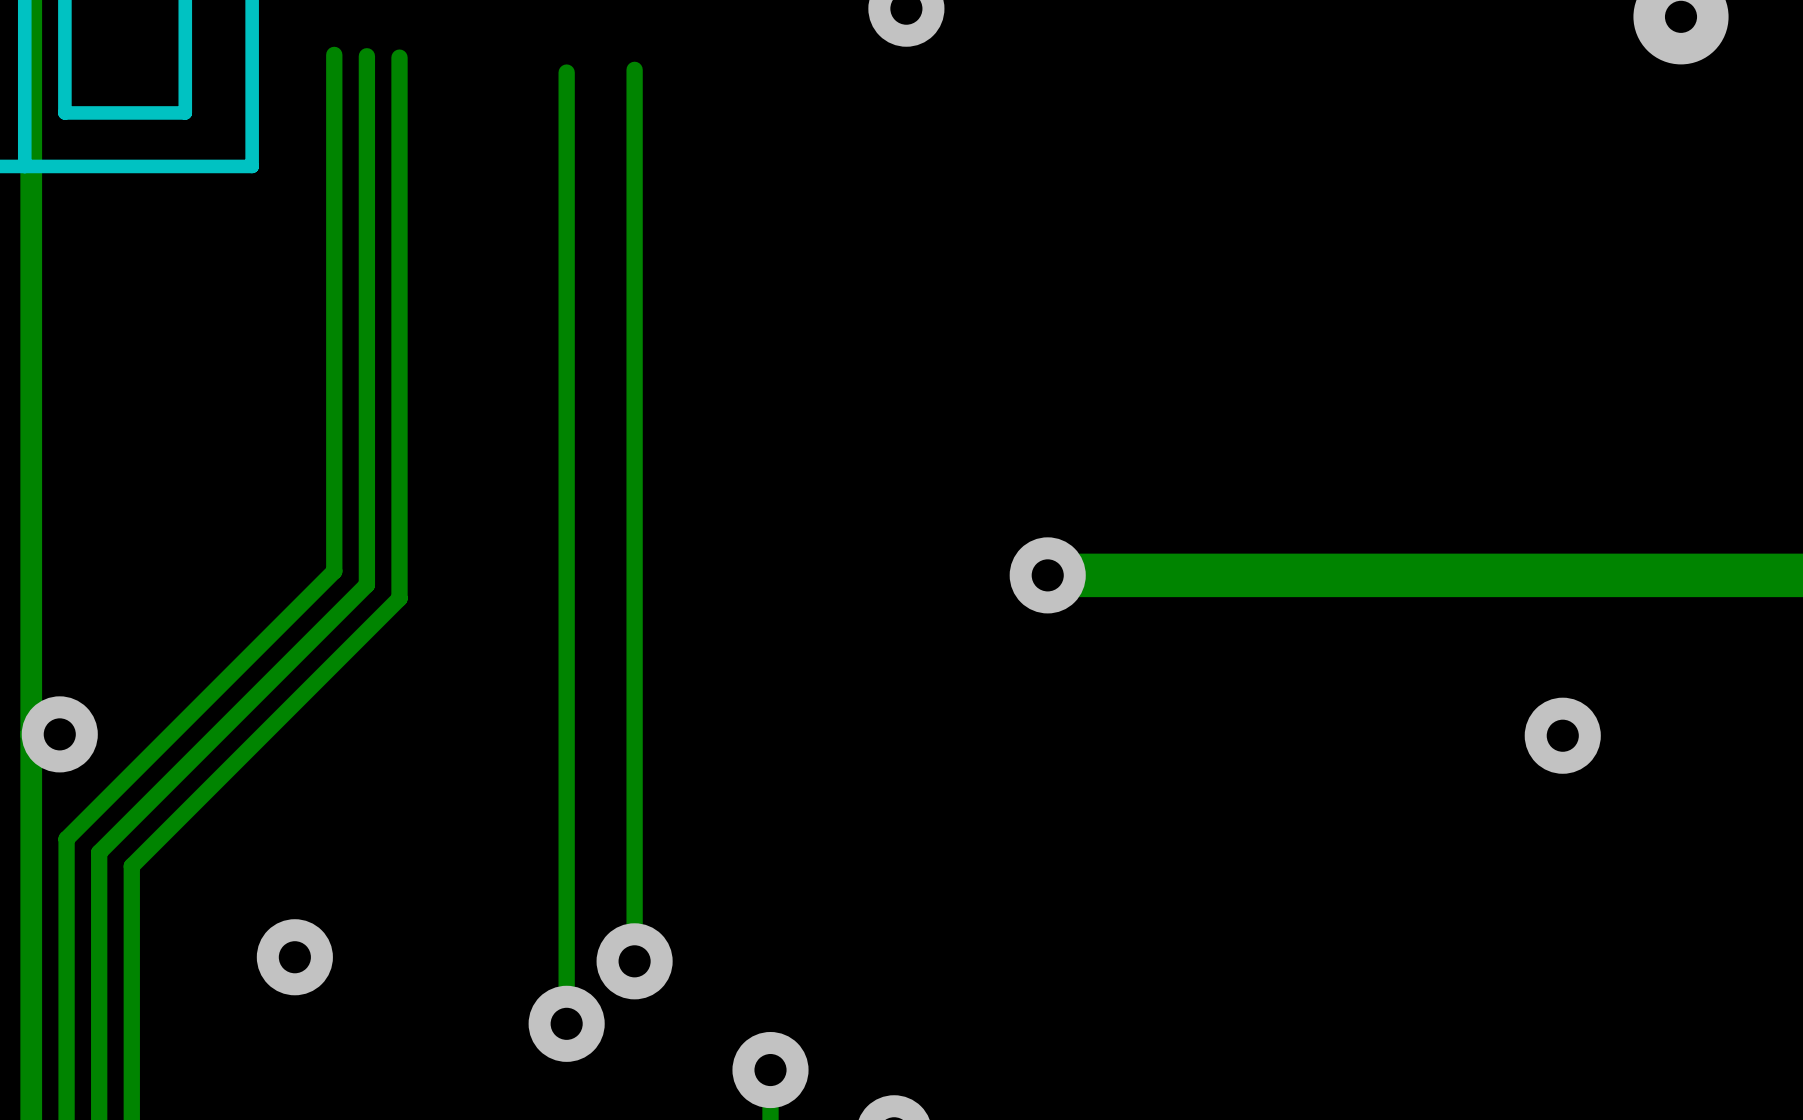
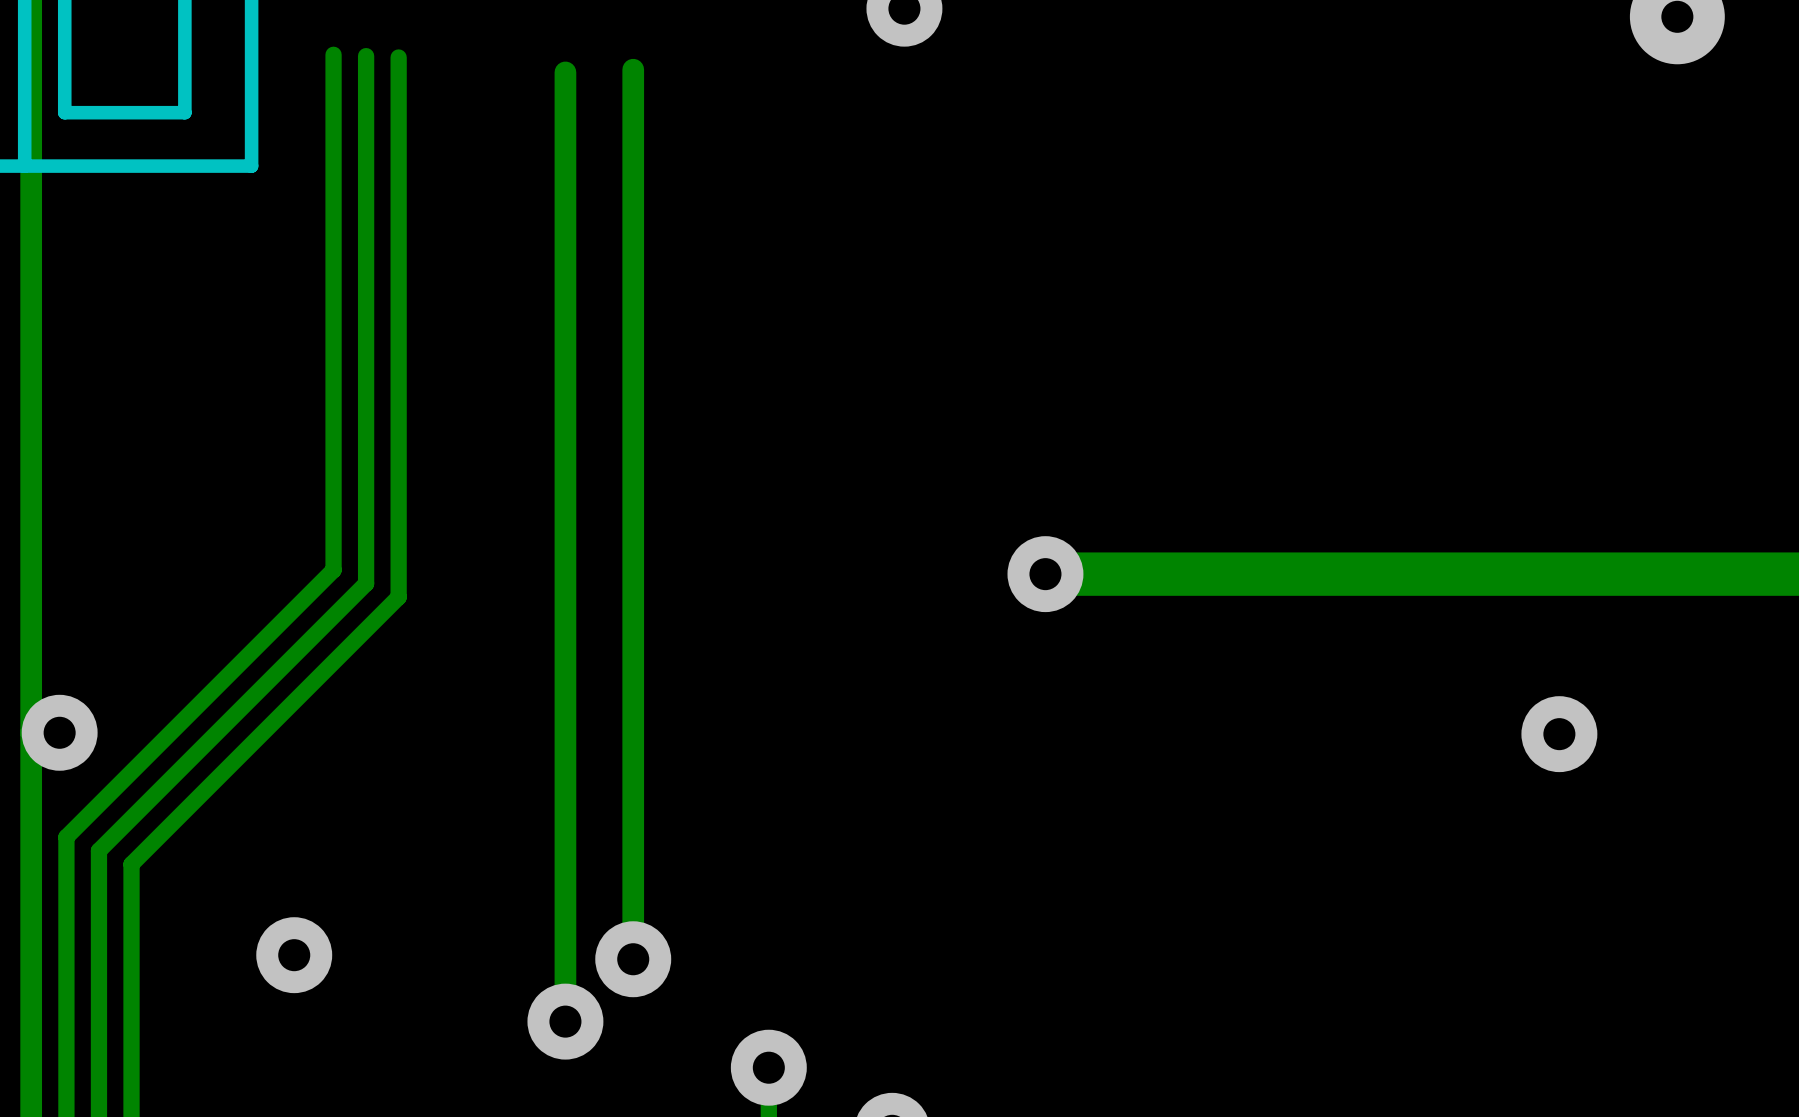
track width: thin (634, 69) (634, 961) -> thick (633, 69) (633, 959)
track width: thin (566, 72) (566, 1023) -> thick (565, 72) (565, 1021)

